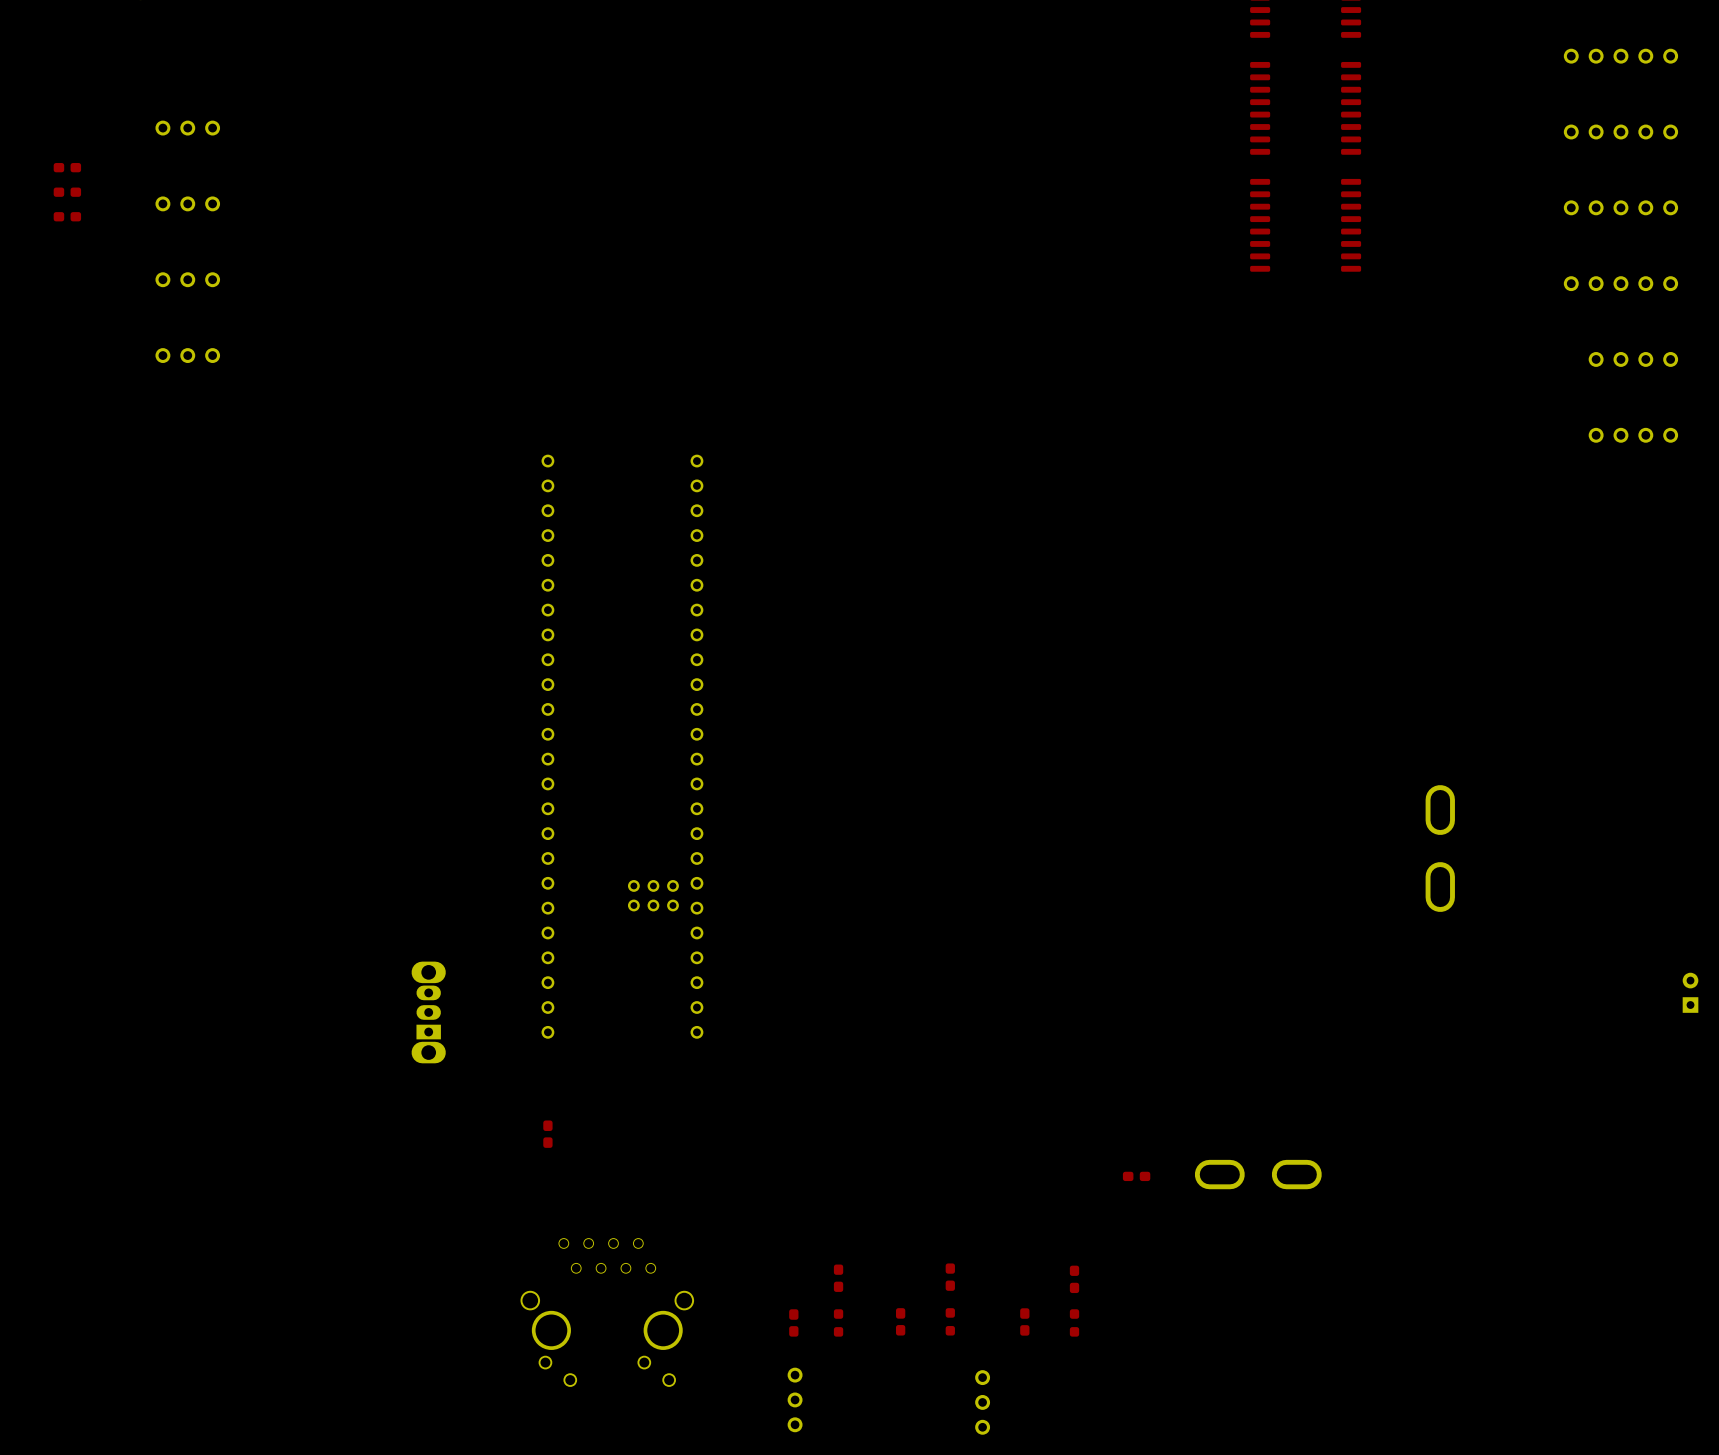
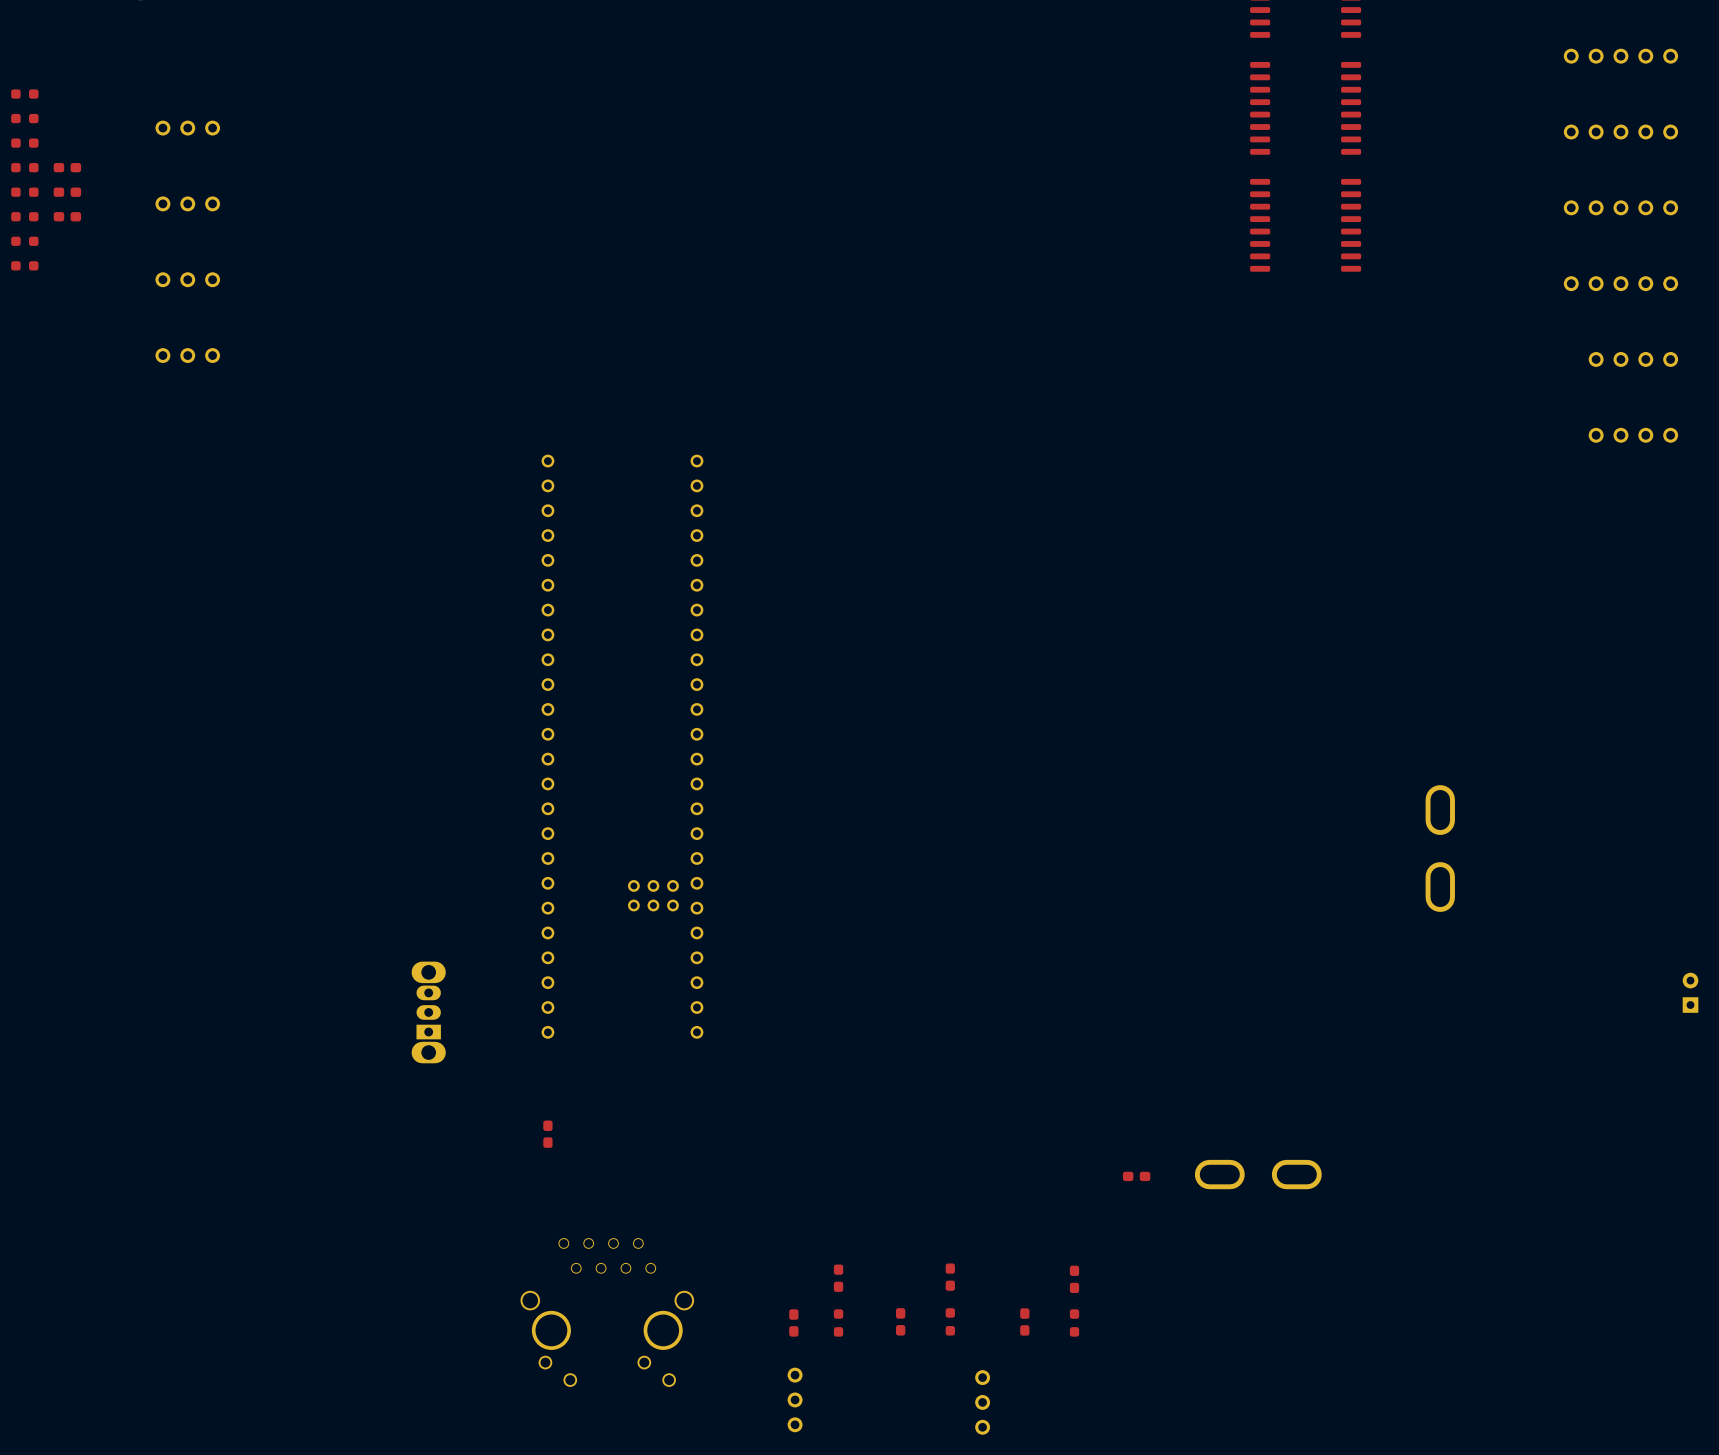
part: none -> (24, 94)
part: none -> (24, 118)
part: none -> (24, 143)
part: none -> (24, 167)
part: none -> (24, 192)
part: none -> (24, 216)
part: none -> (24, 241)
part: none -> (24, 265)

